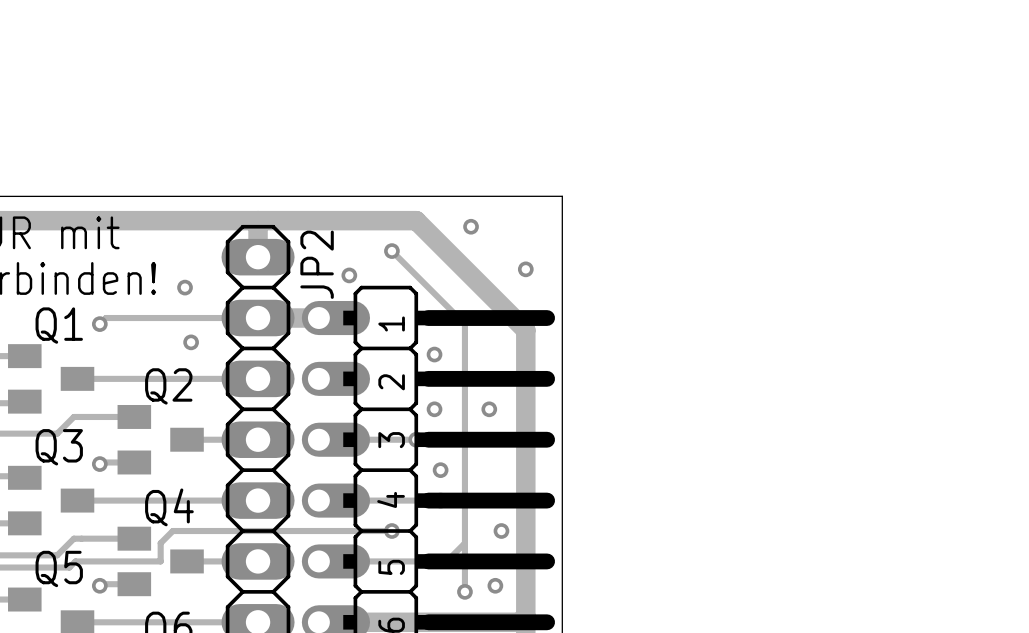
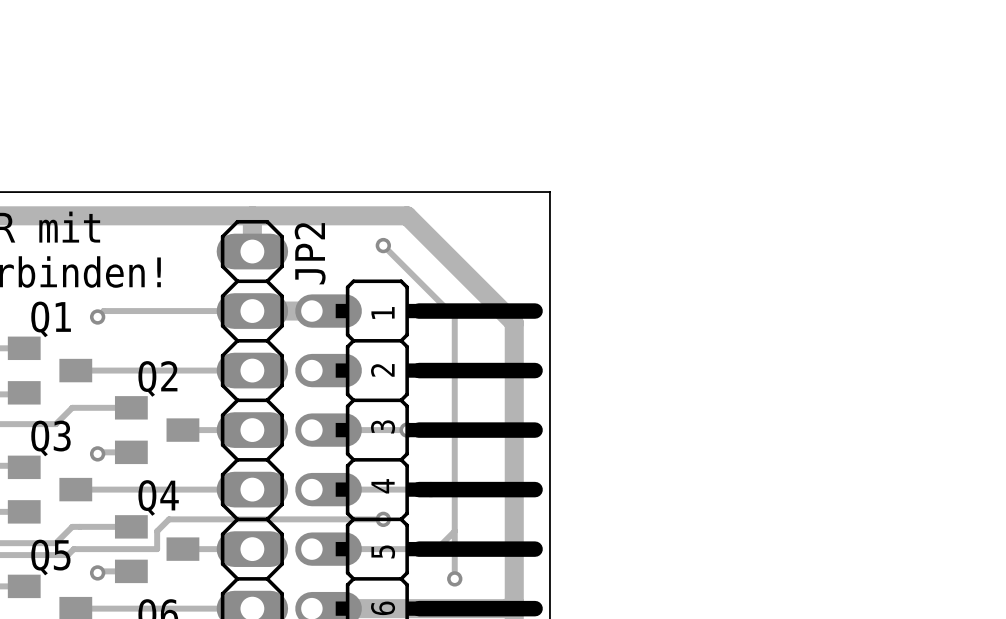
via: (471, 226) -> none
via: (525, 269) -> none
via: (349, 275) -> none
via: (185, 287) -> none
via: (191, 342) -> none
via: (434, 354) -> none
via: (434, 409) -> none
via: (489, 409) -> none
via: (440, 470) -> none
via: (501, 531) -> none
via: (495, 585) -> none

